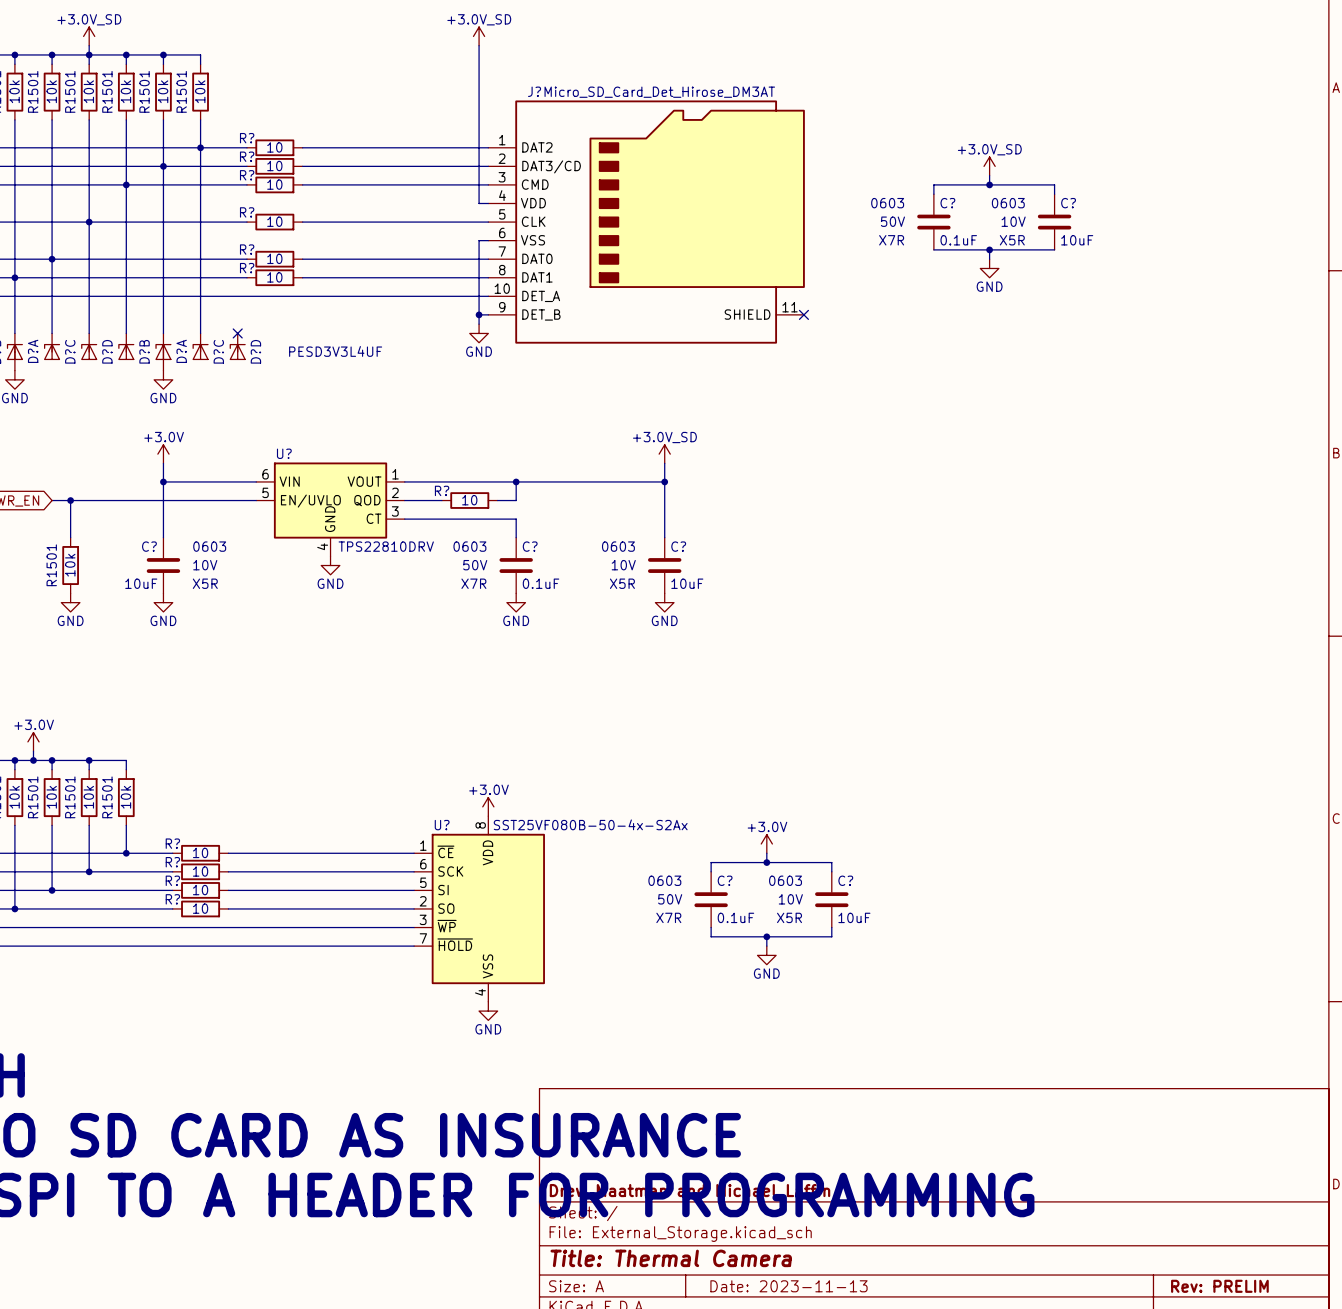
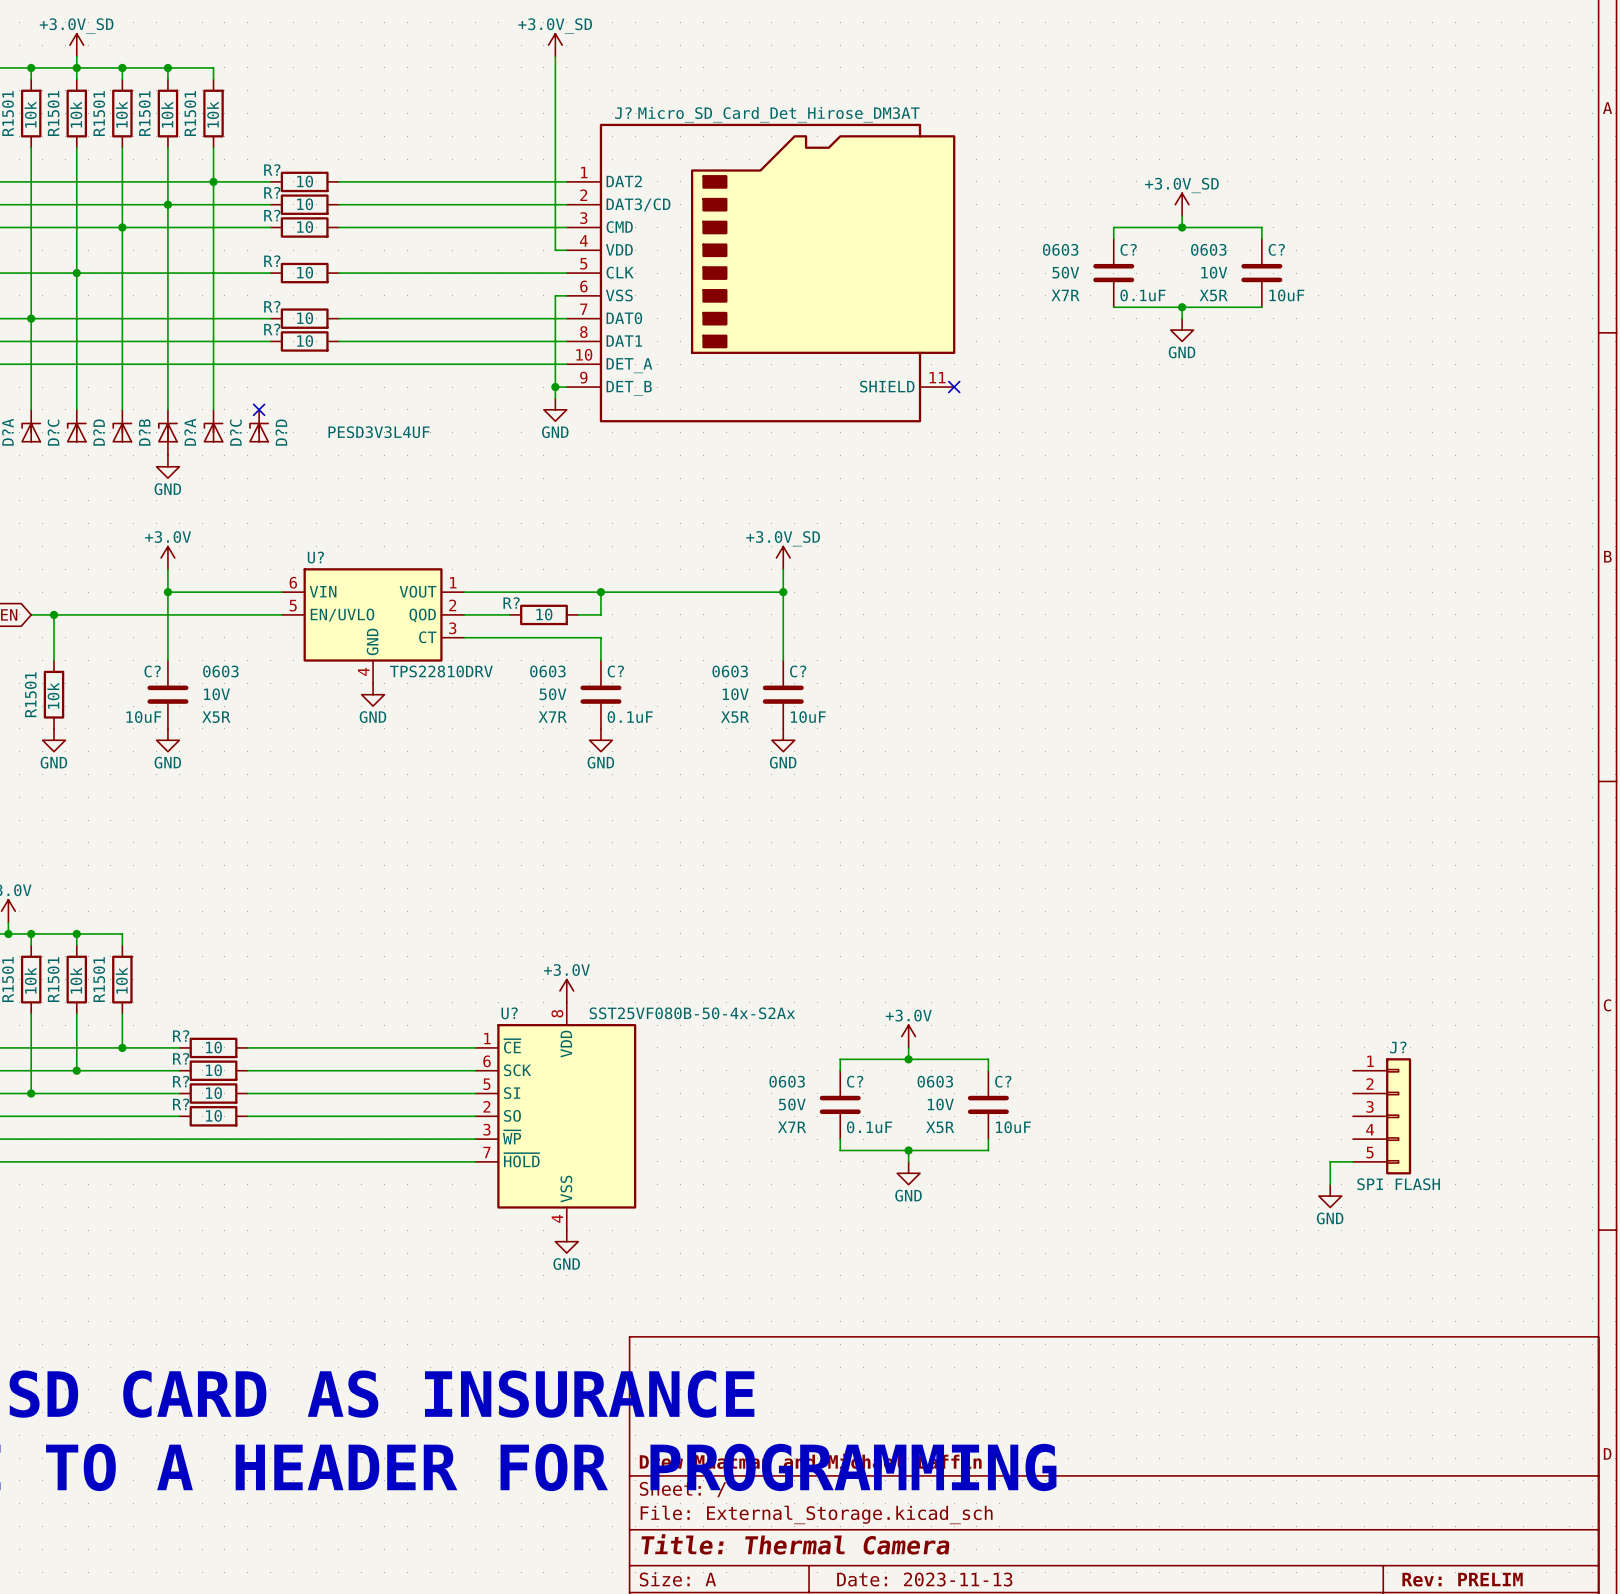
J?: none -> SPI FLASH (1382, 1116)
wire: none -> (1353, 1161) (1330, 1161) (1330, 1184)
power symbol: none -> GND (1330, 1196)

